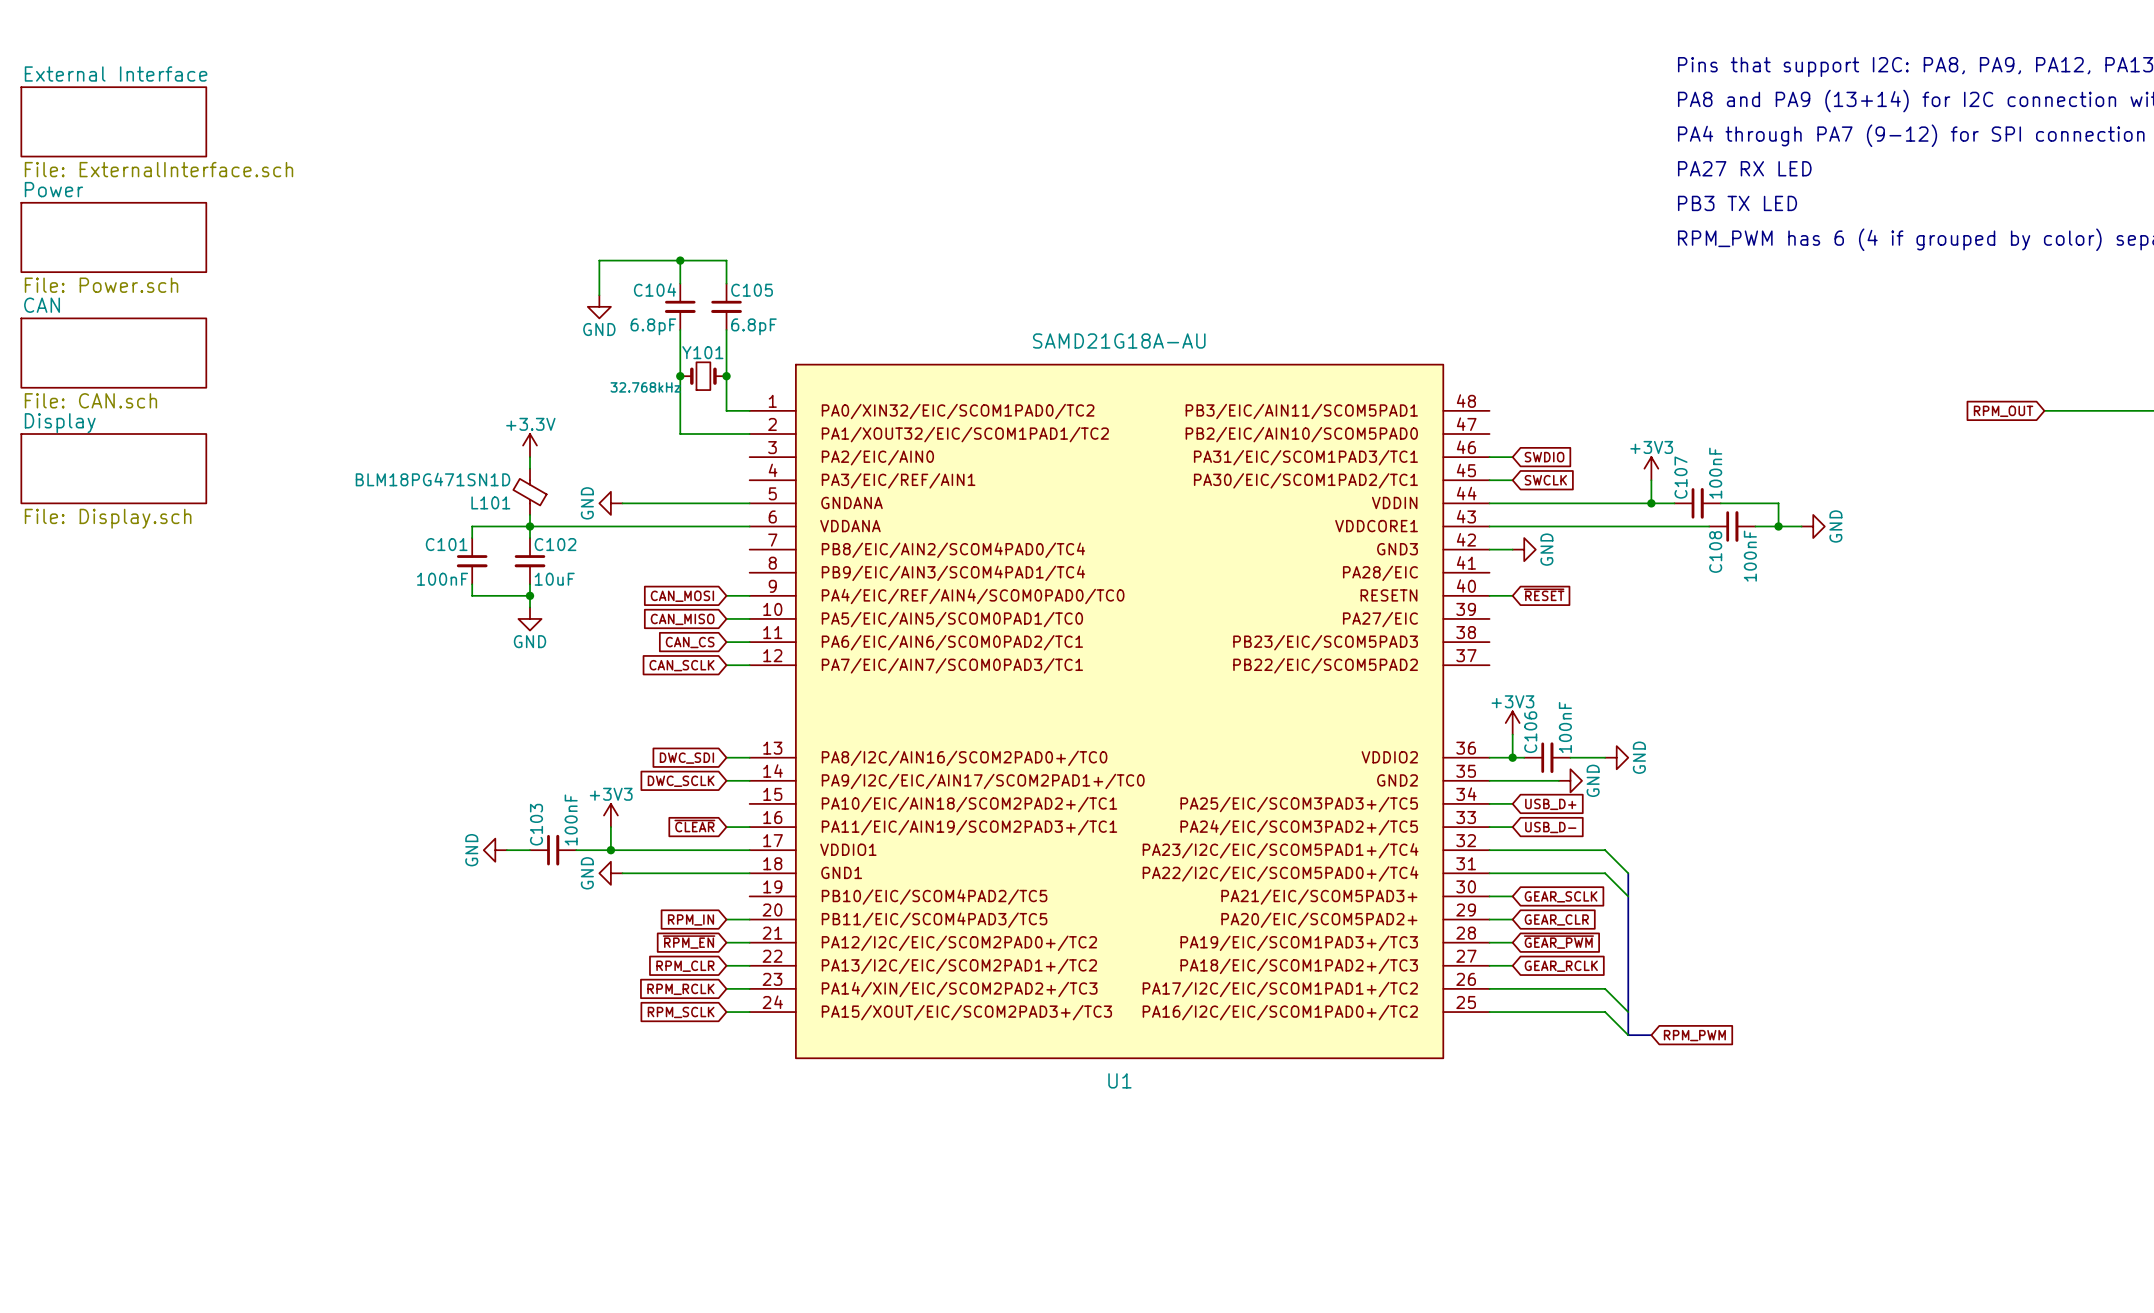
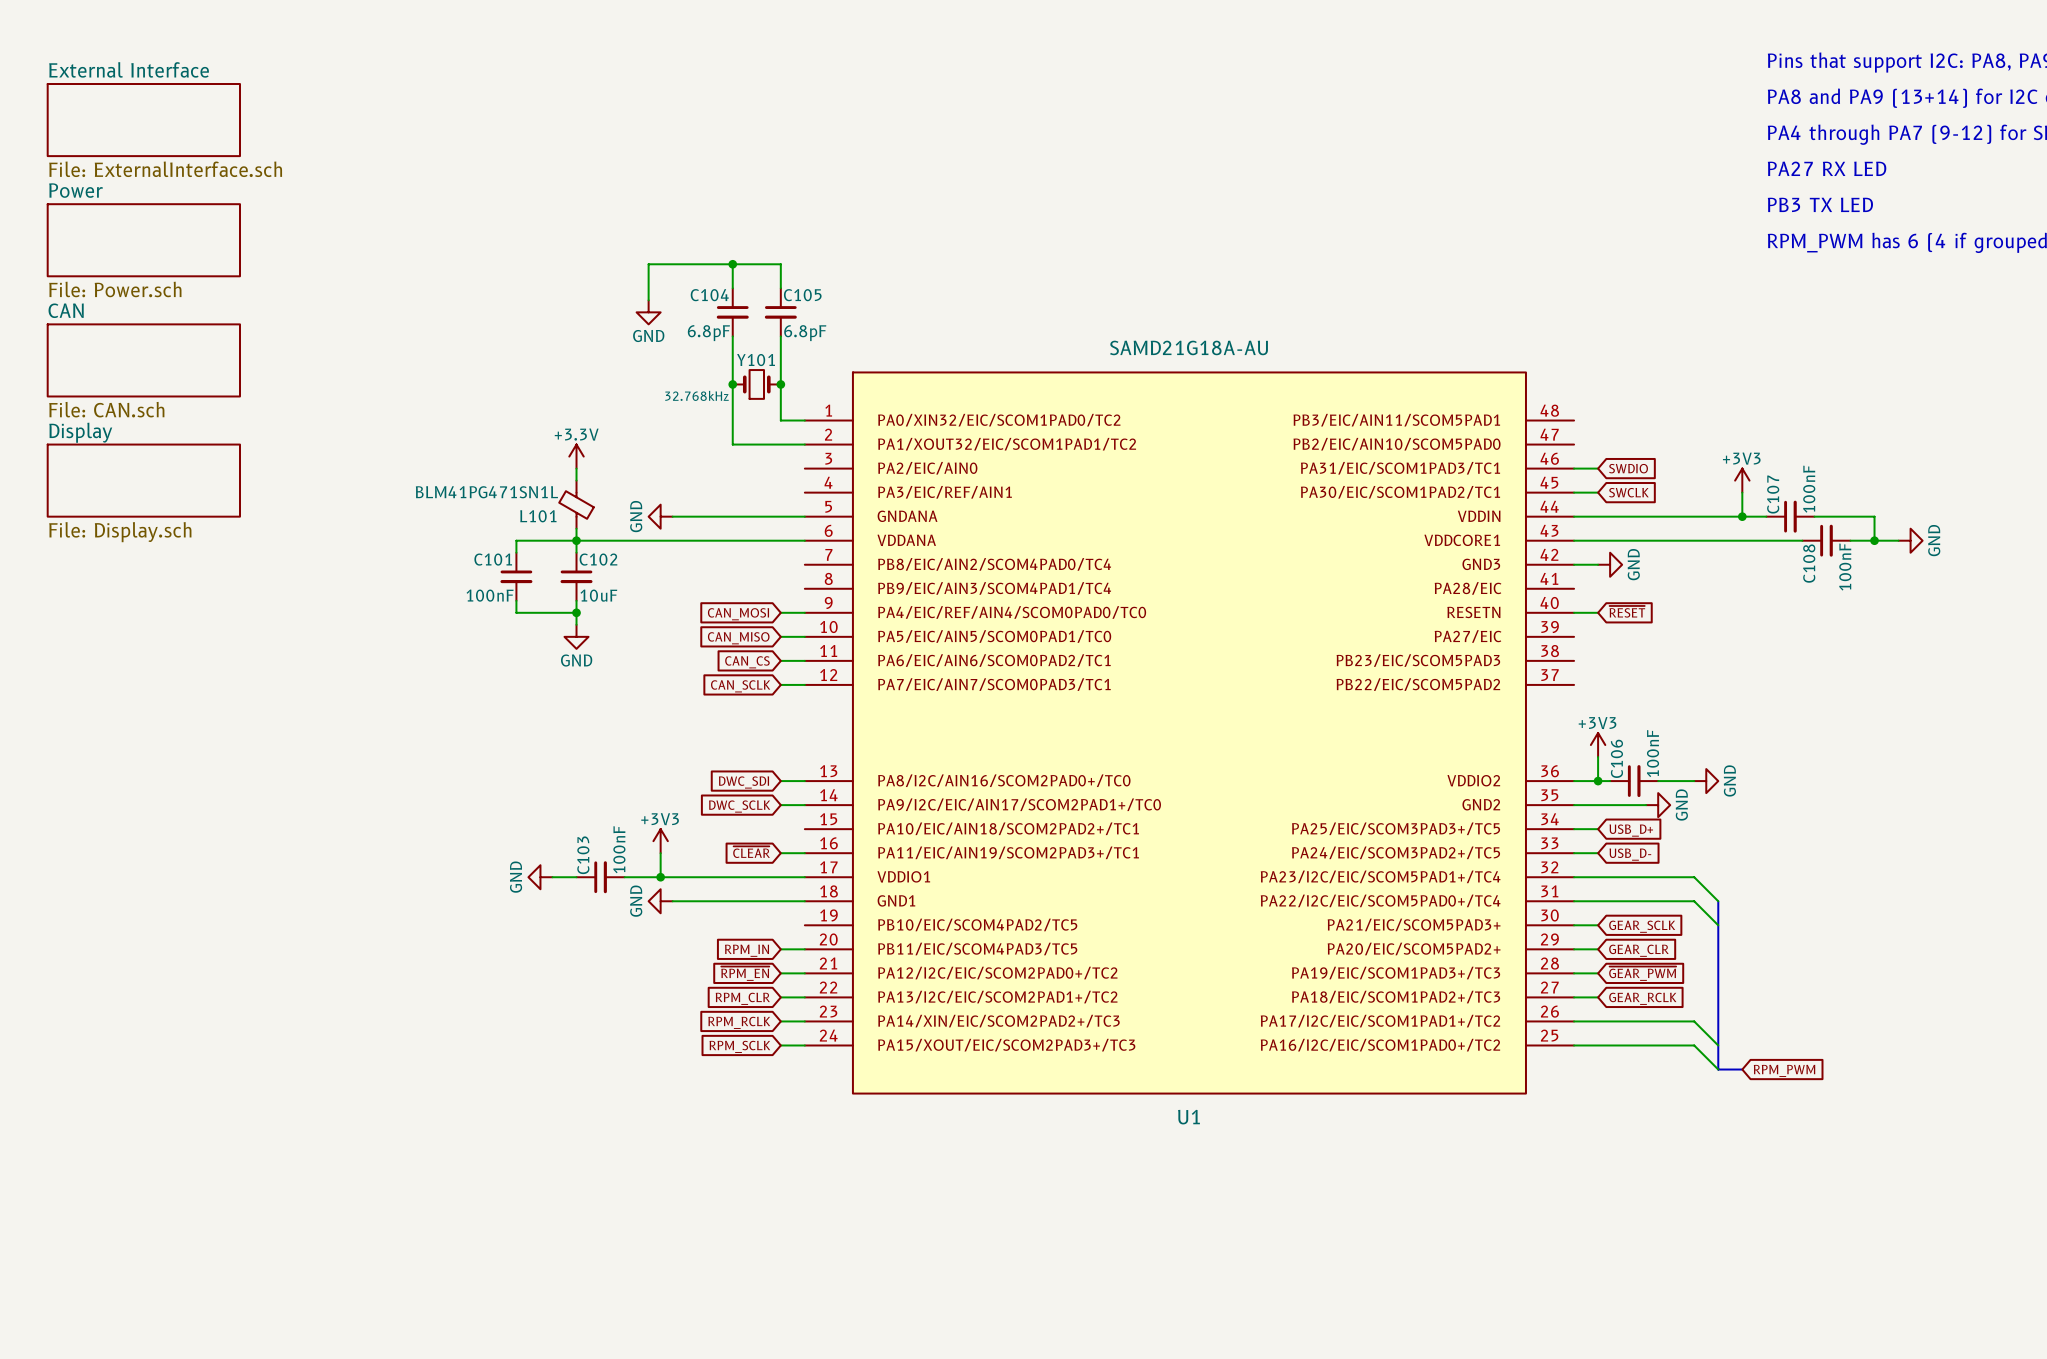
L101 value: BLM18PG471SN1D (433, 479) -> BLM41PG471SN1L (486, 492)

